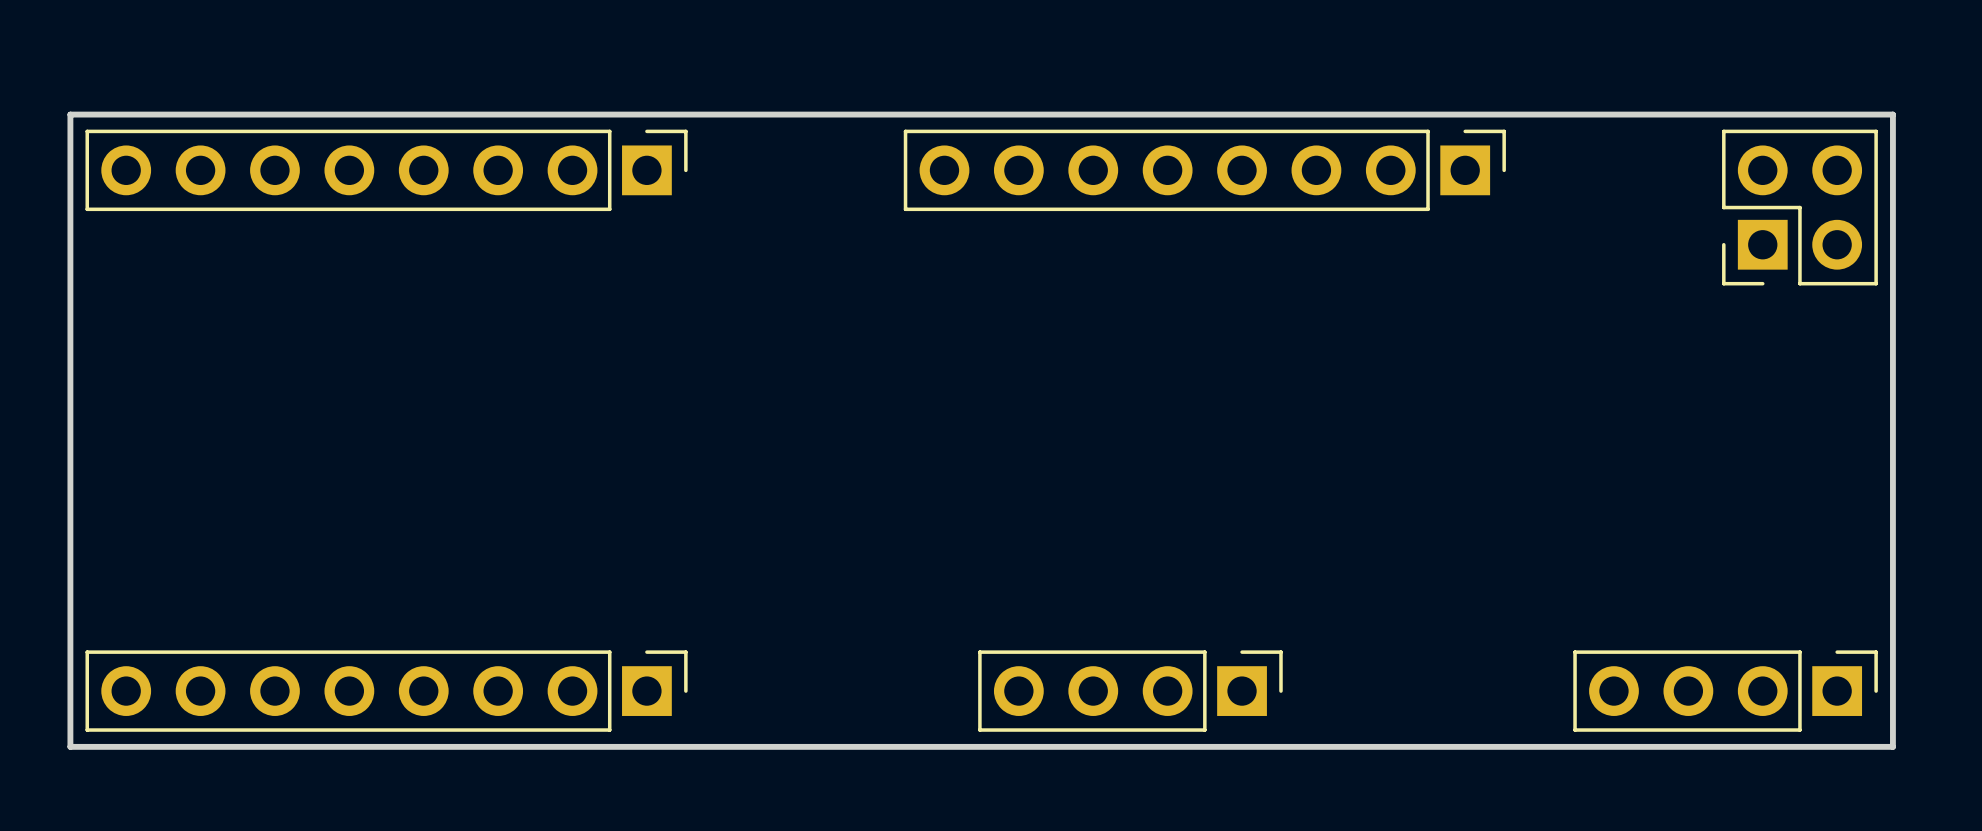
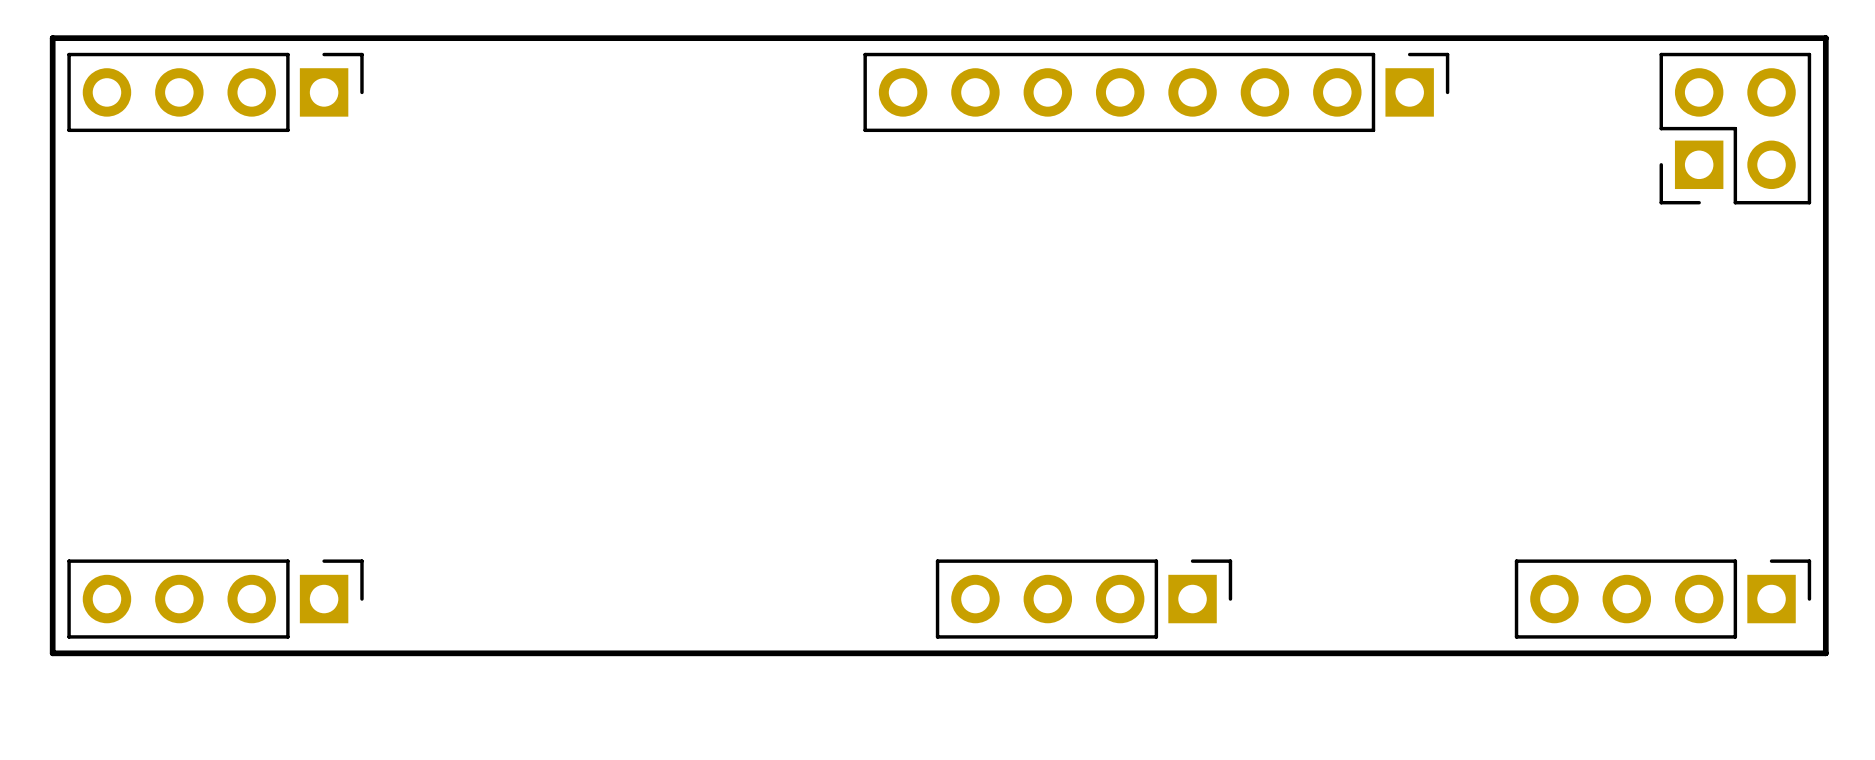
part: none -> (215, 92)
part: (386, 170) -> none
part: none -> (215, 599)
part: (386, 691) -> none

